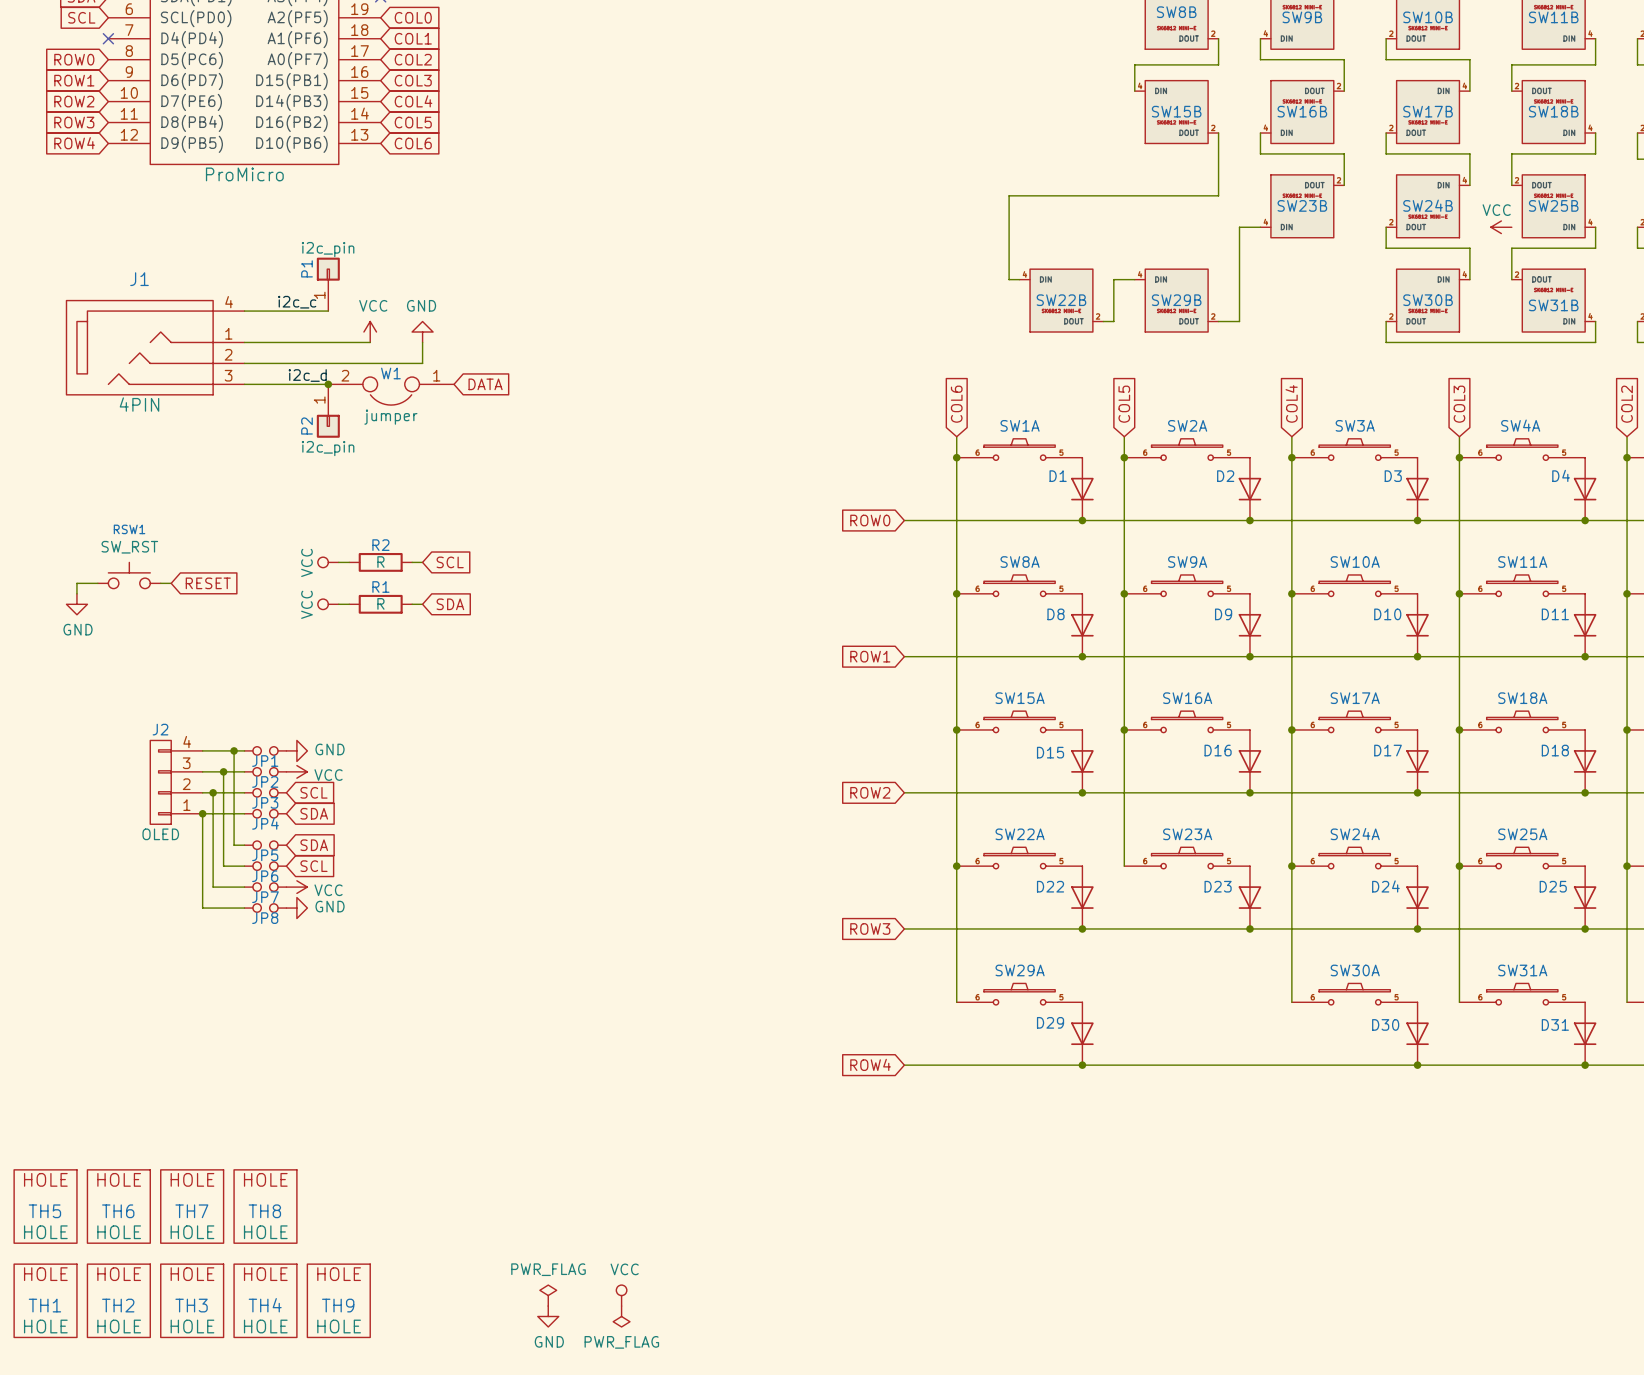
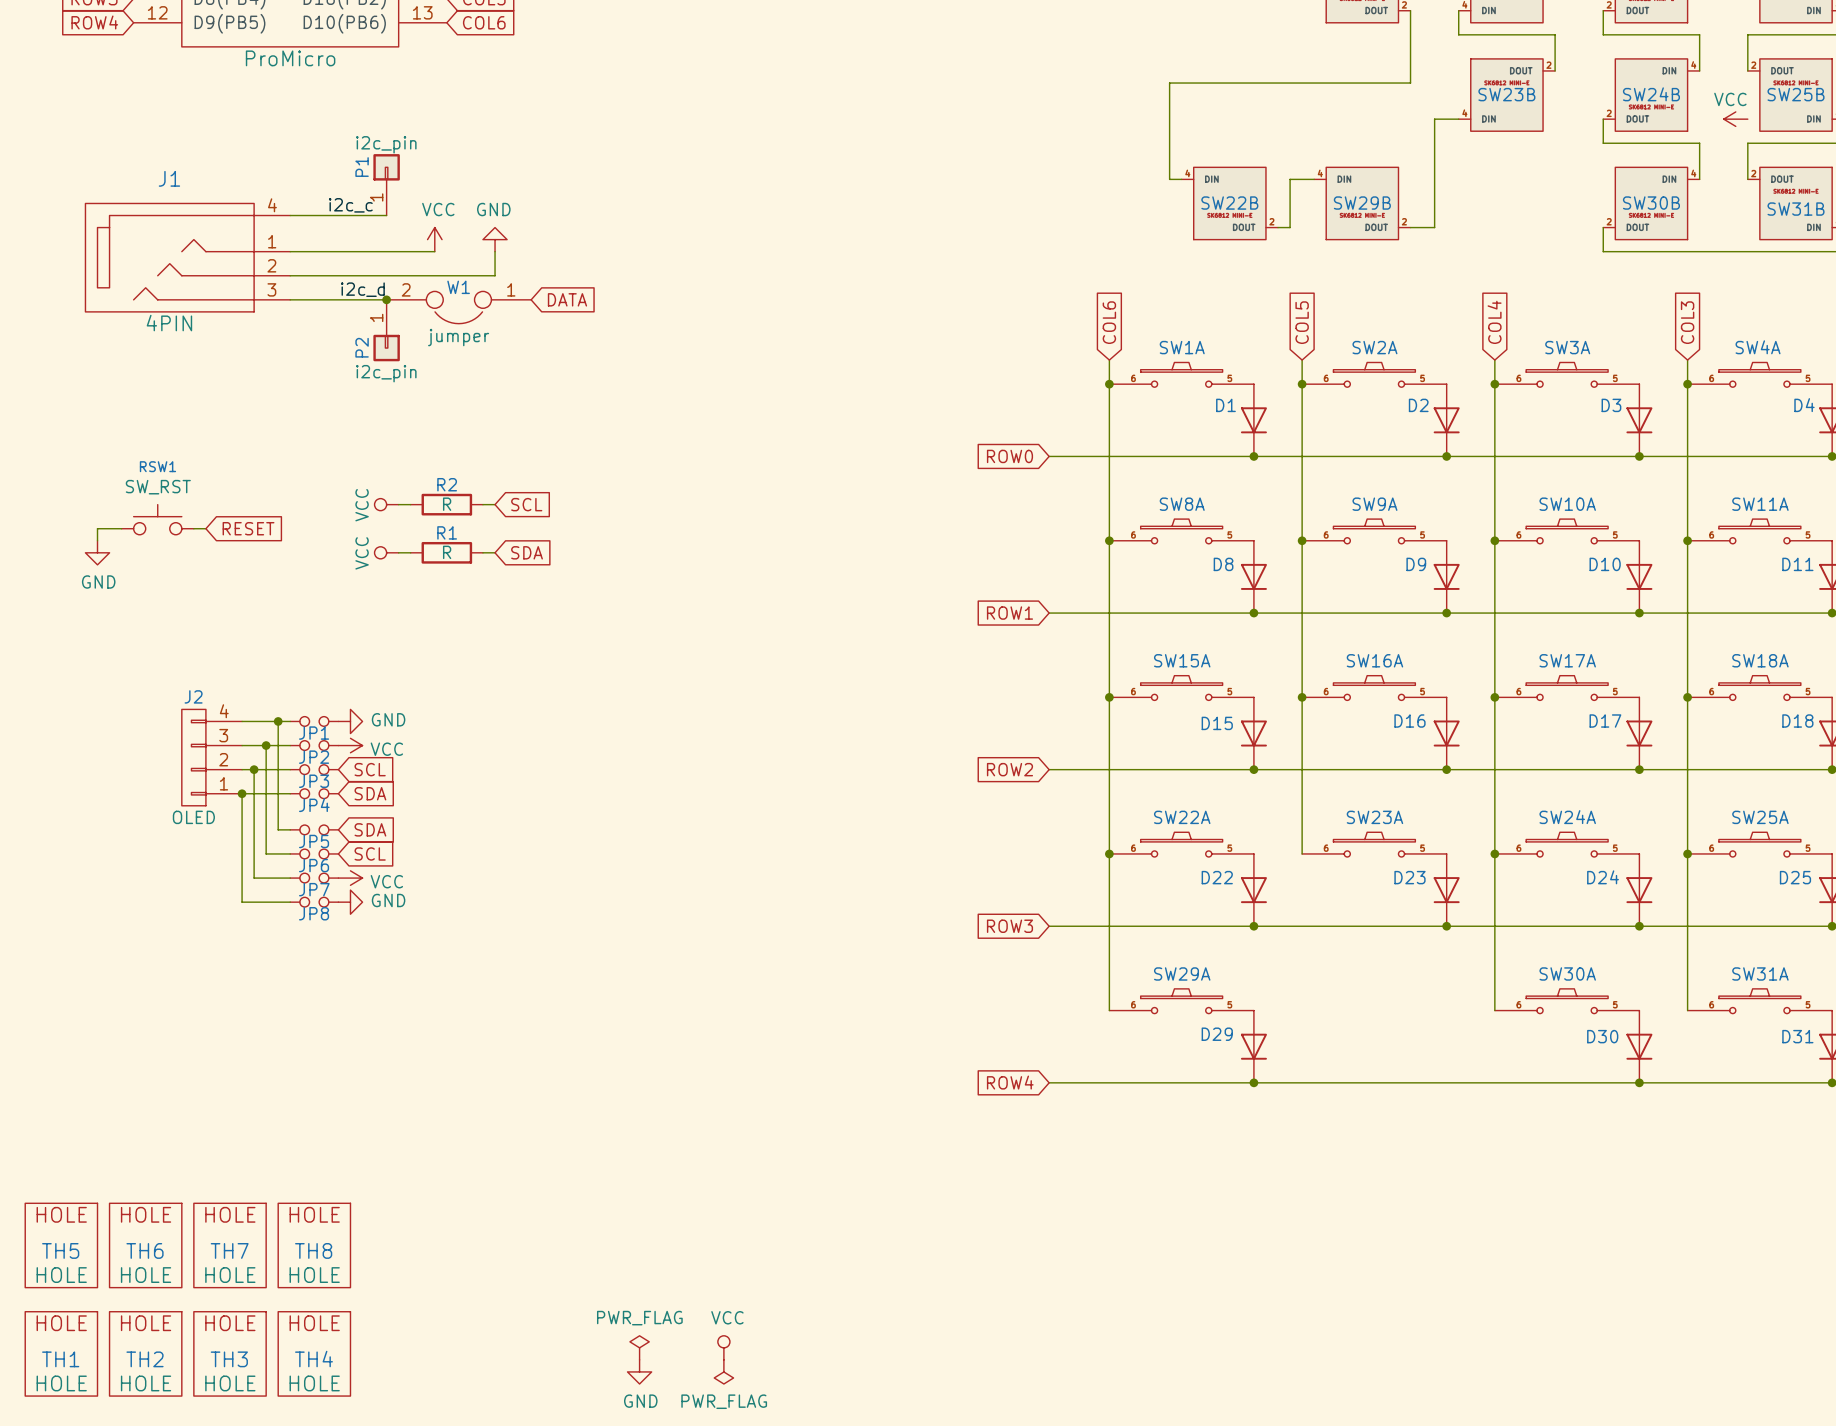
TH9: HOLE (338, 1300) -> none

